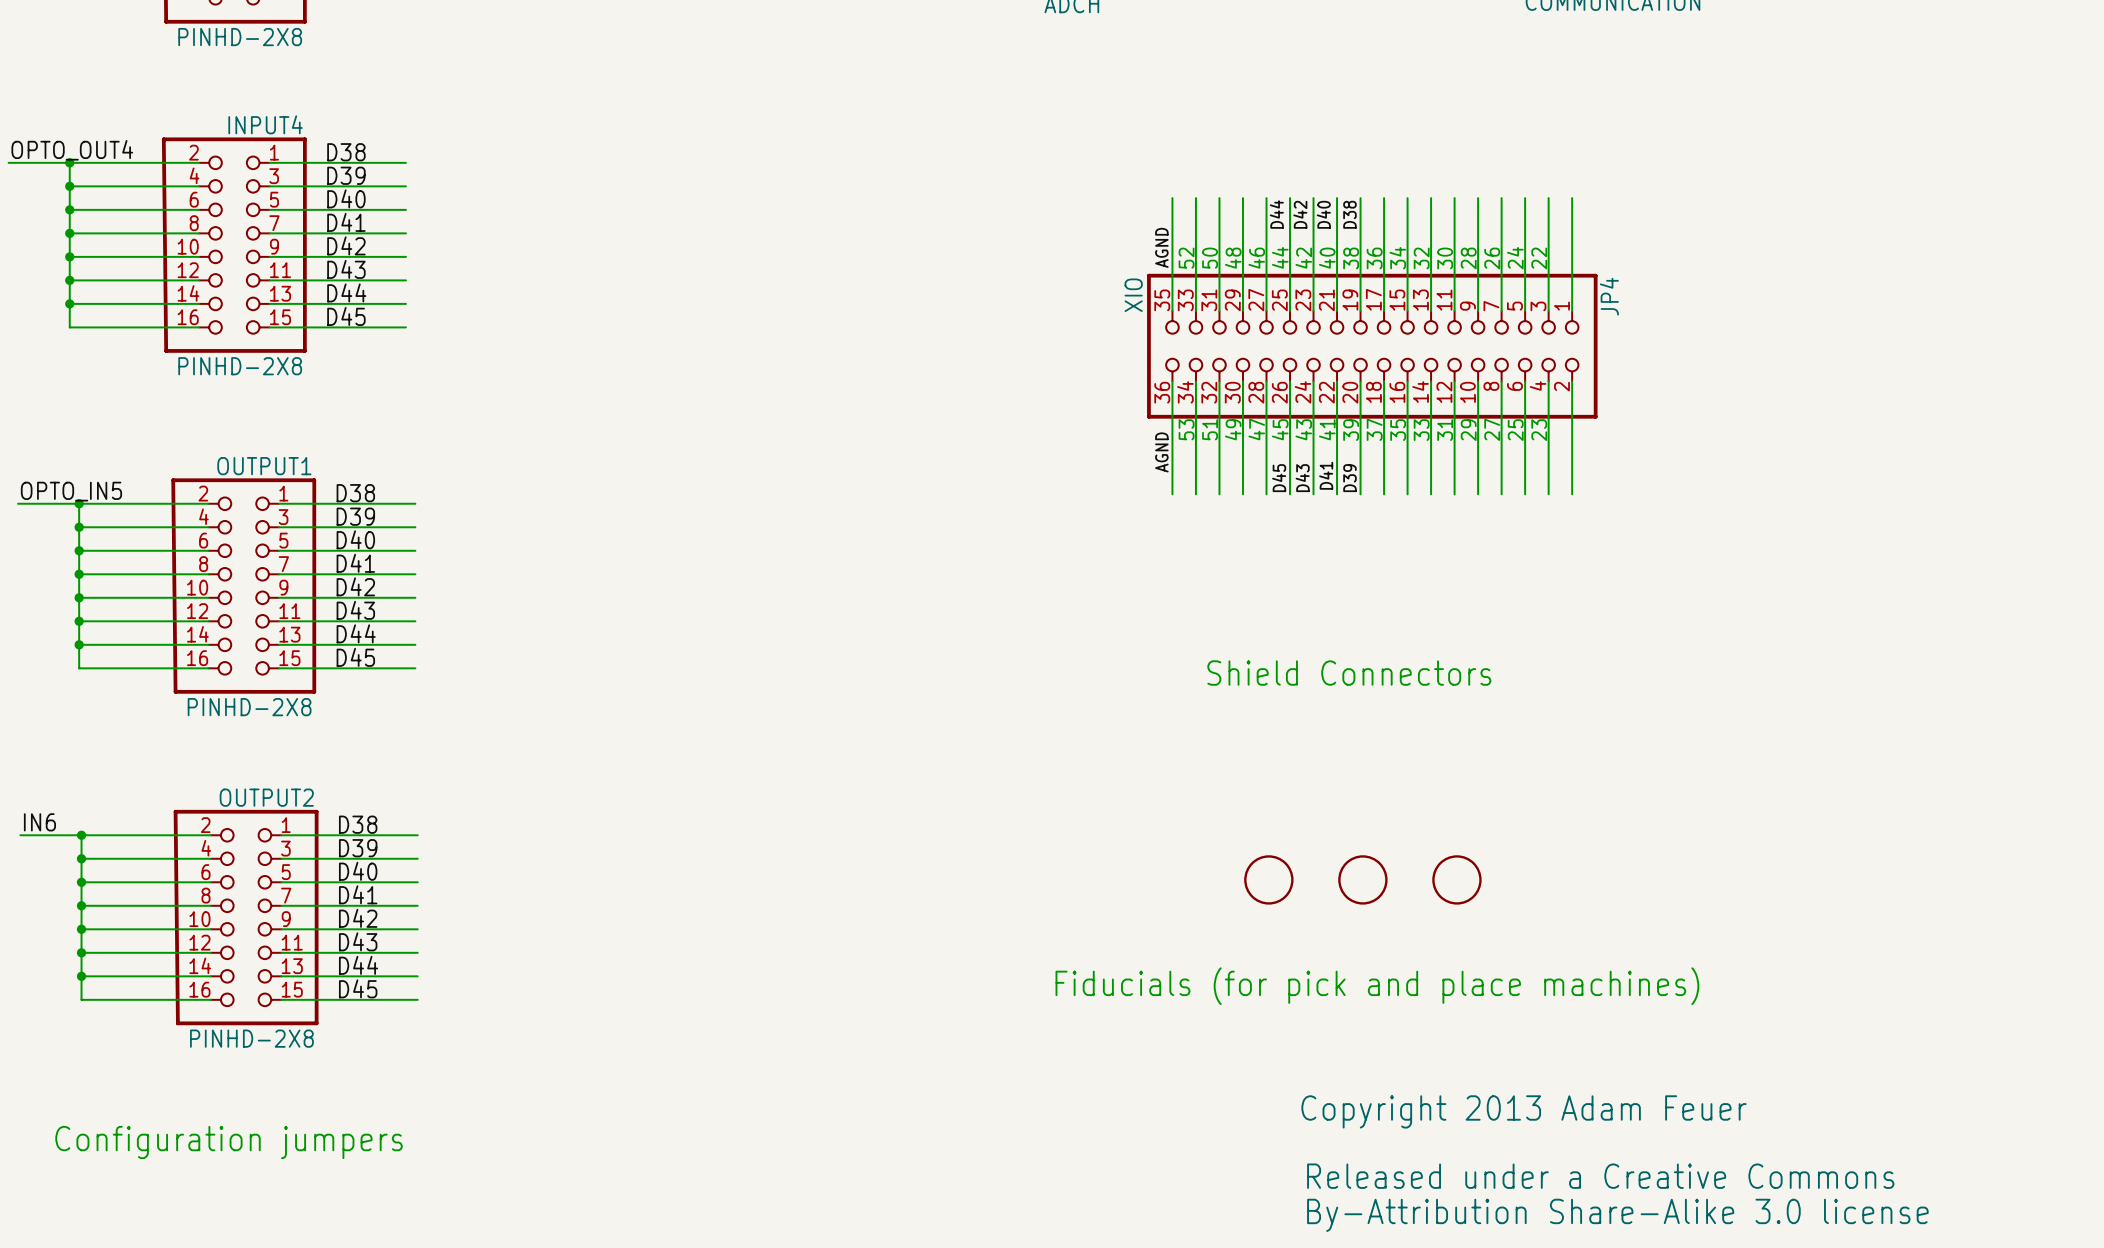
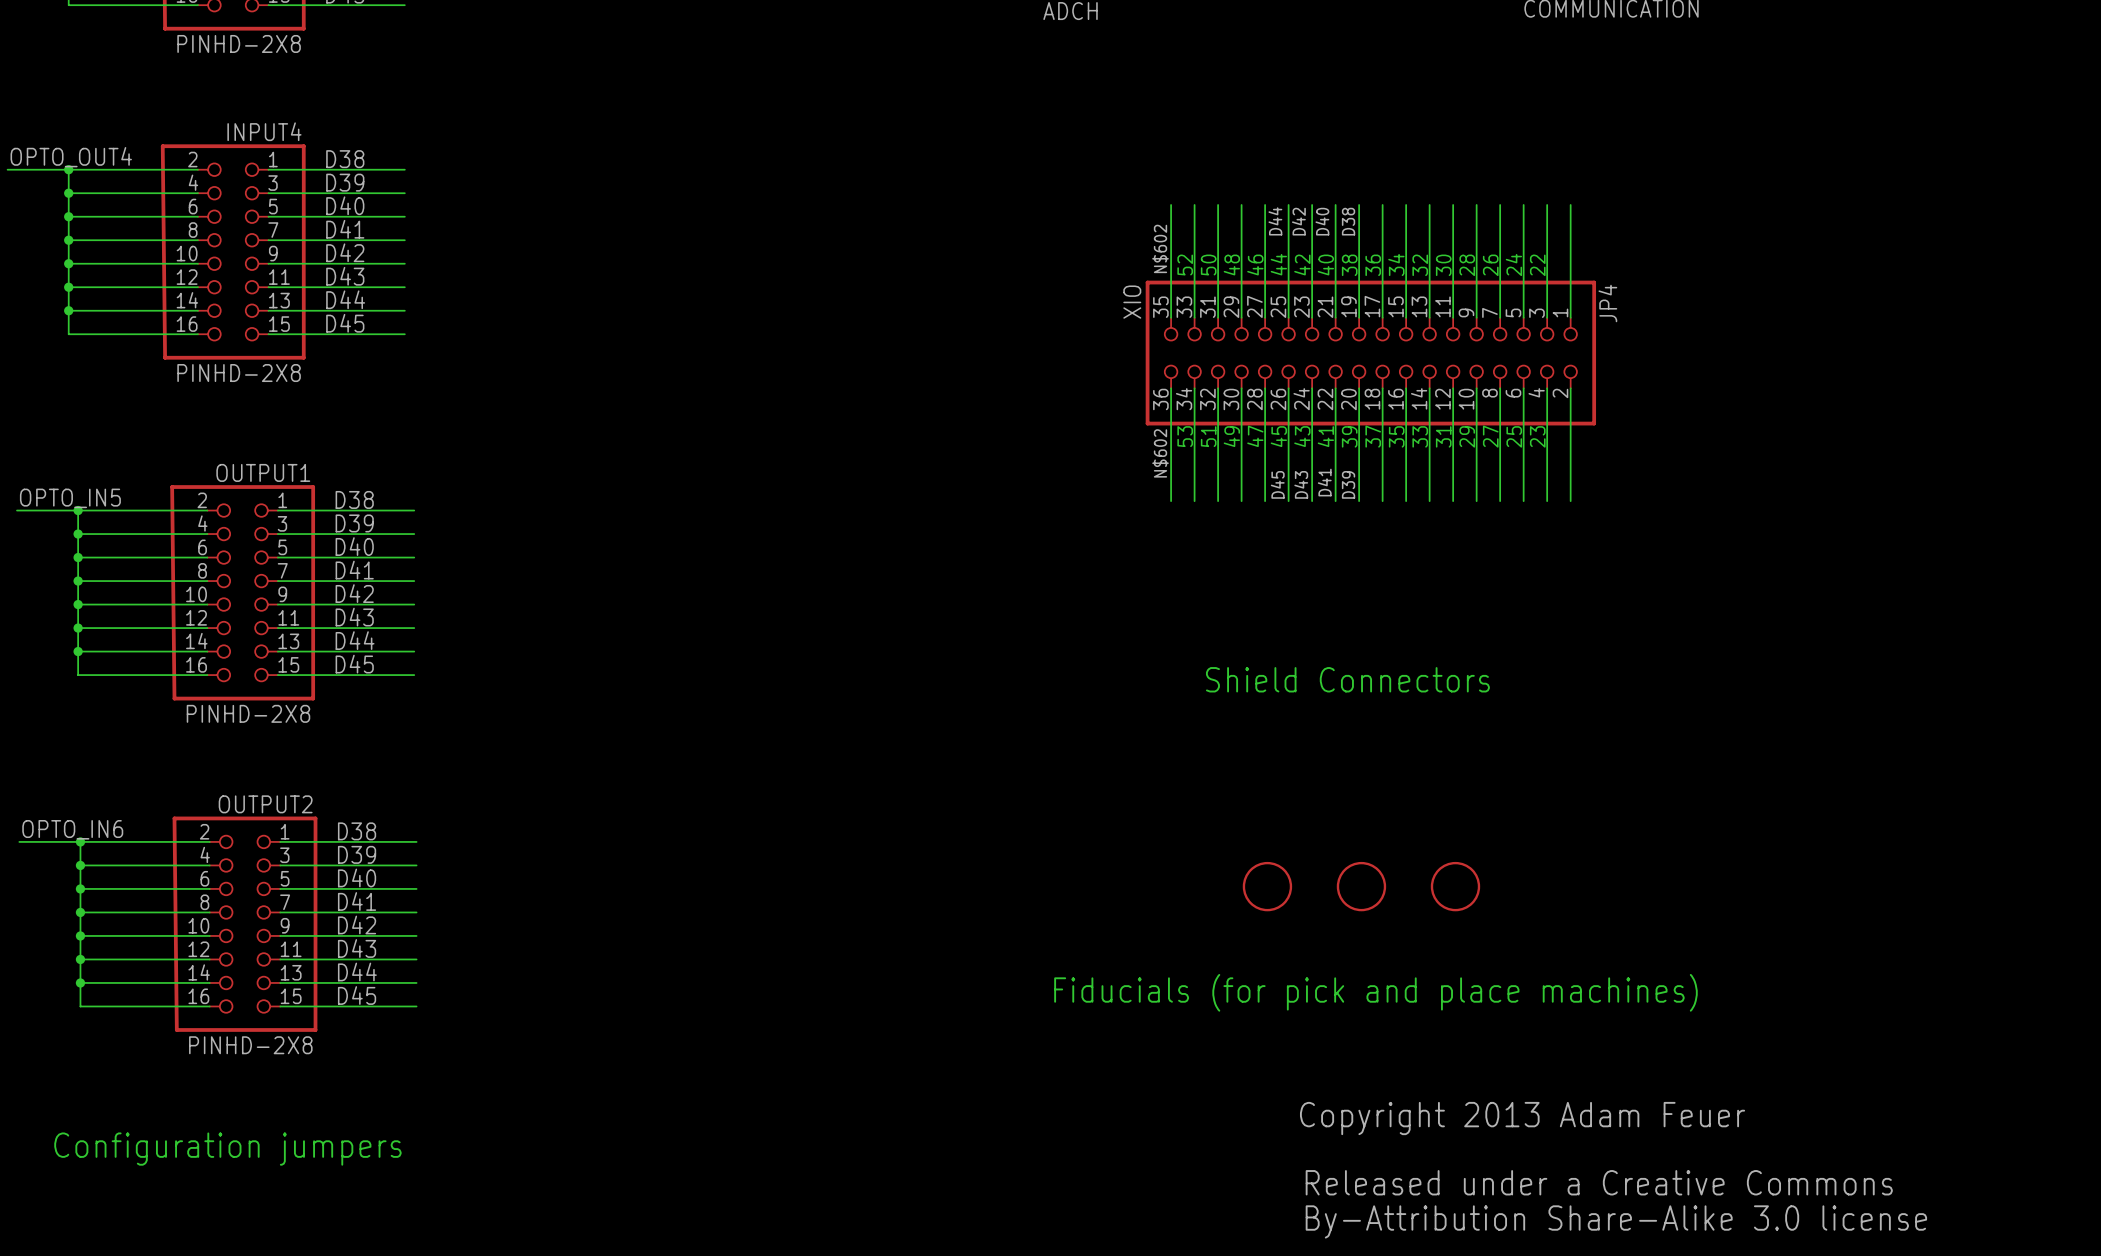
label: AGND (1161, 247) -> N$602 (1160, 248)
label: AGND (1161, 452) -> N$602 (1160, 453)
label: IN6 (39, 822) -> OPTO_IN6 (72, 829)

